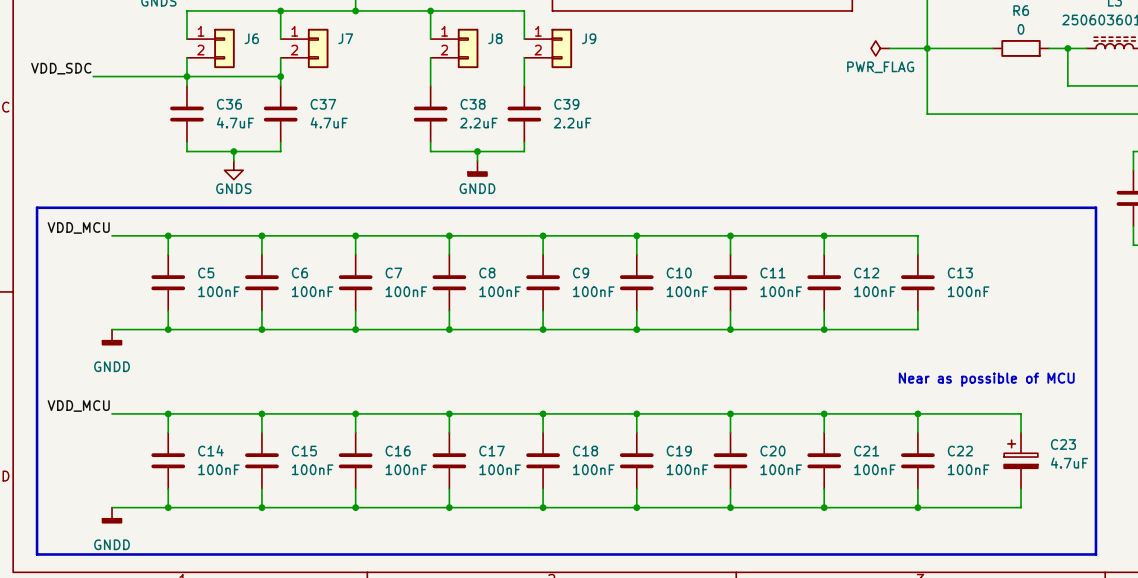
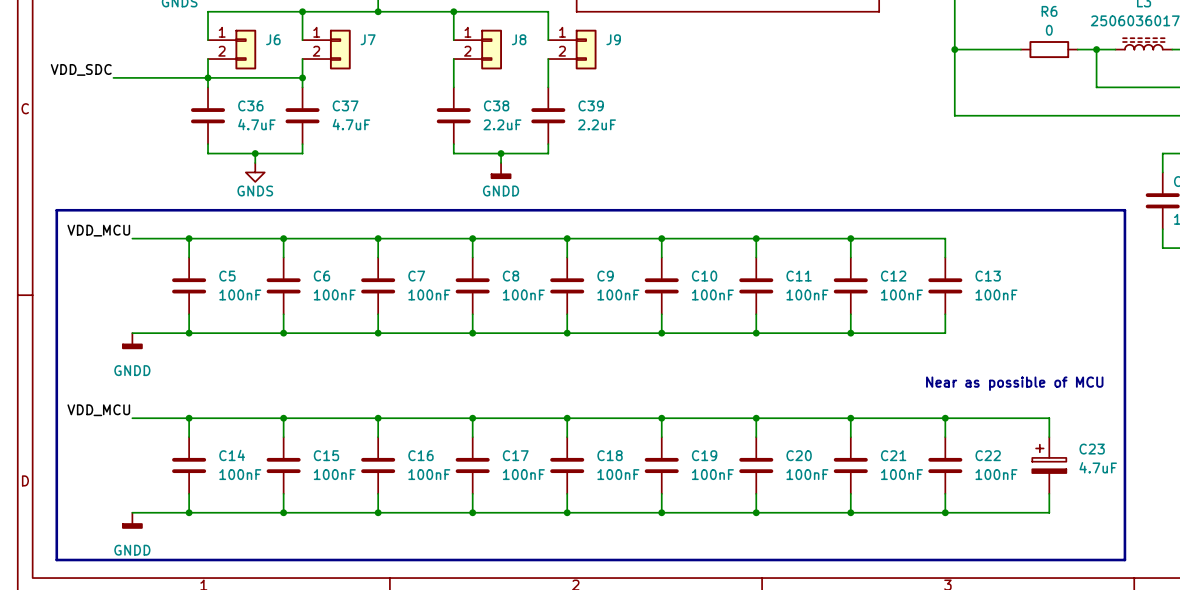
power symbol: PWR_FLAG (880, 48) -> none
wire: (889, 48) (927, 48) -> none

